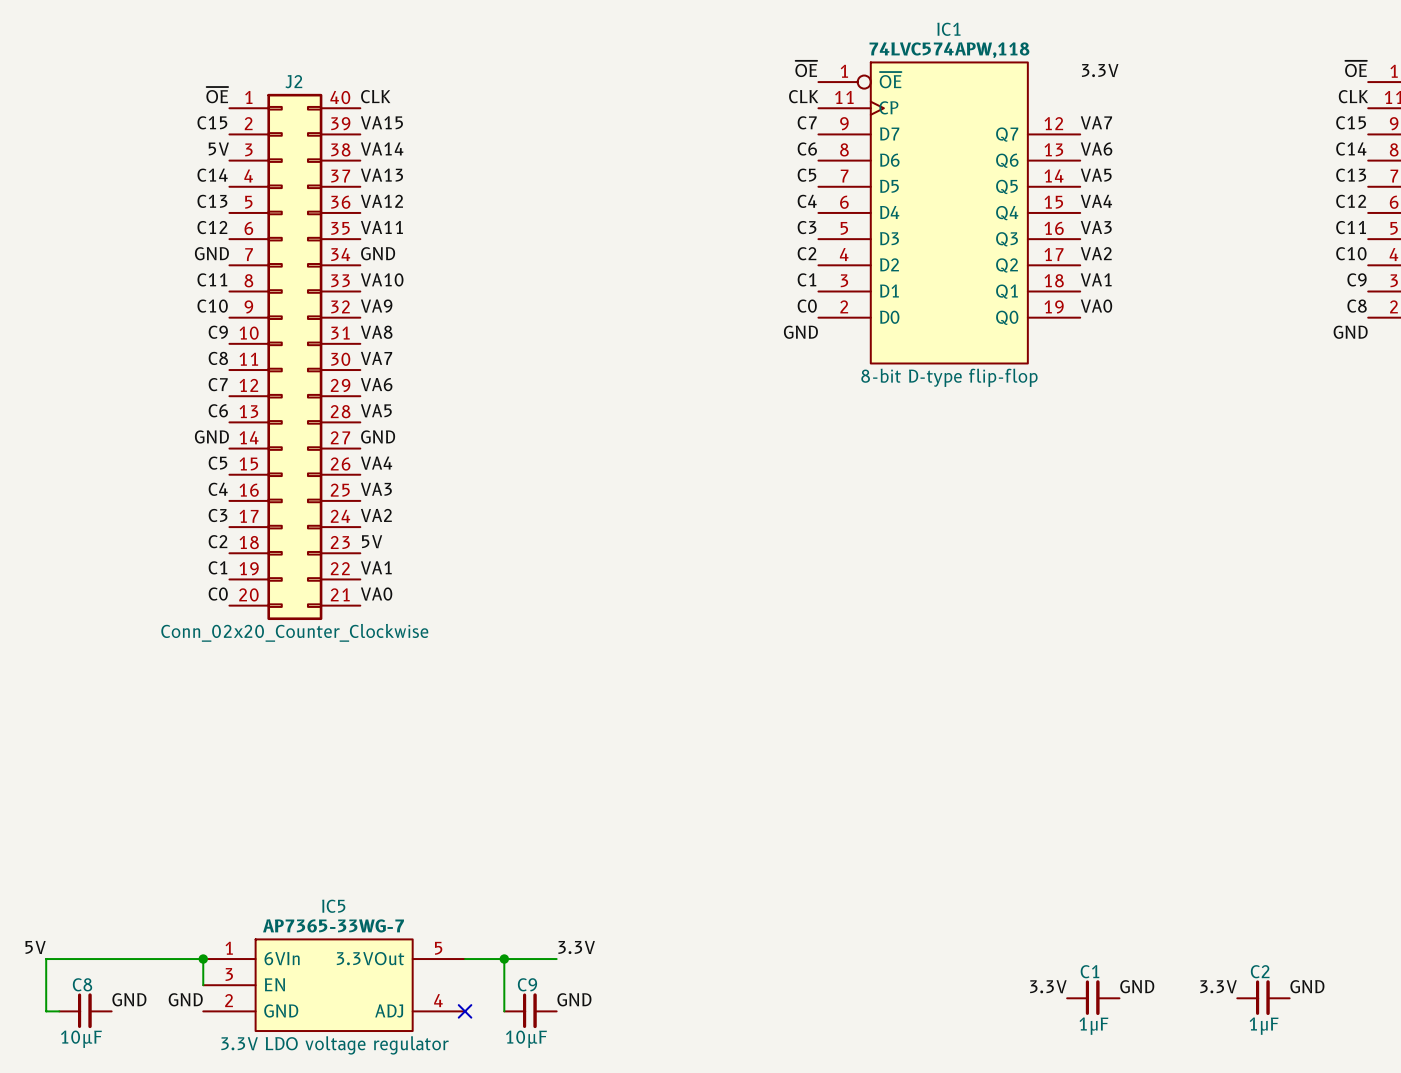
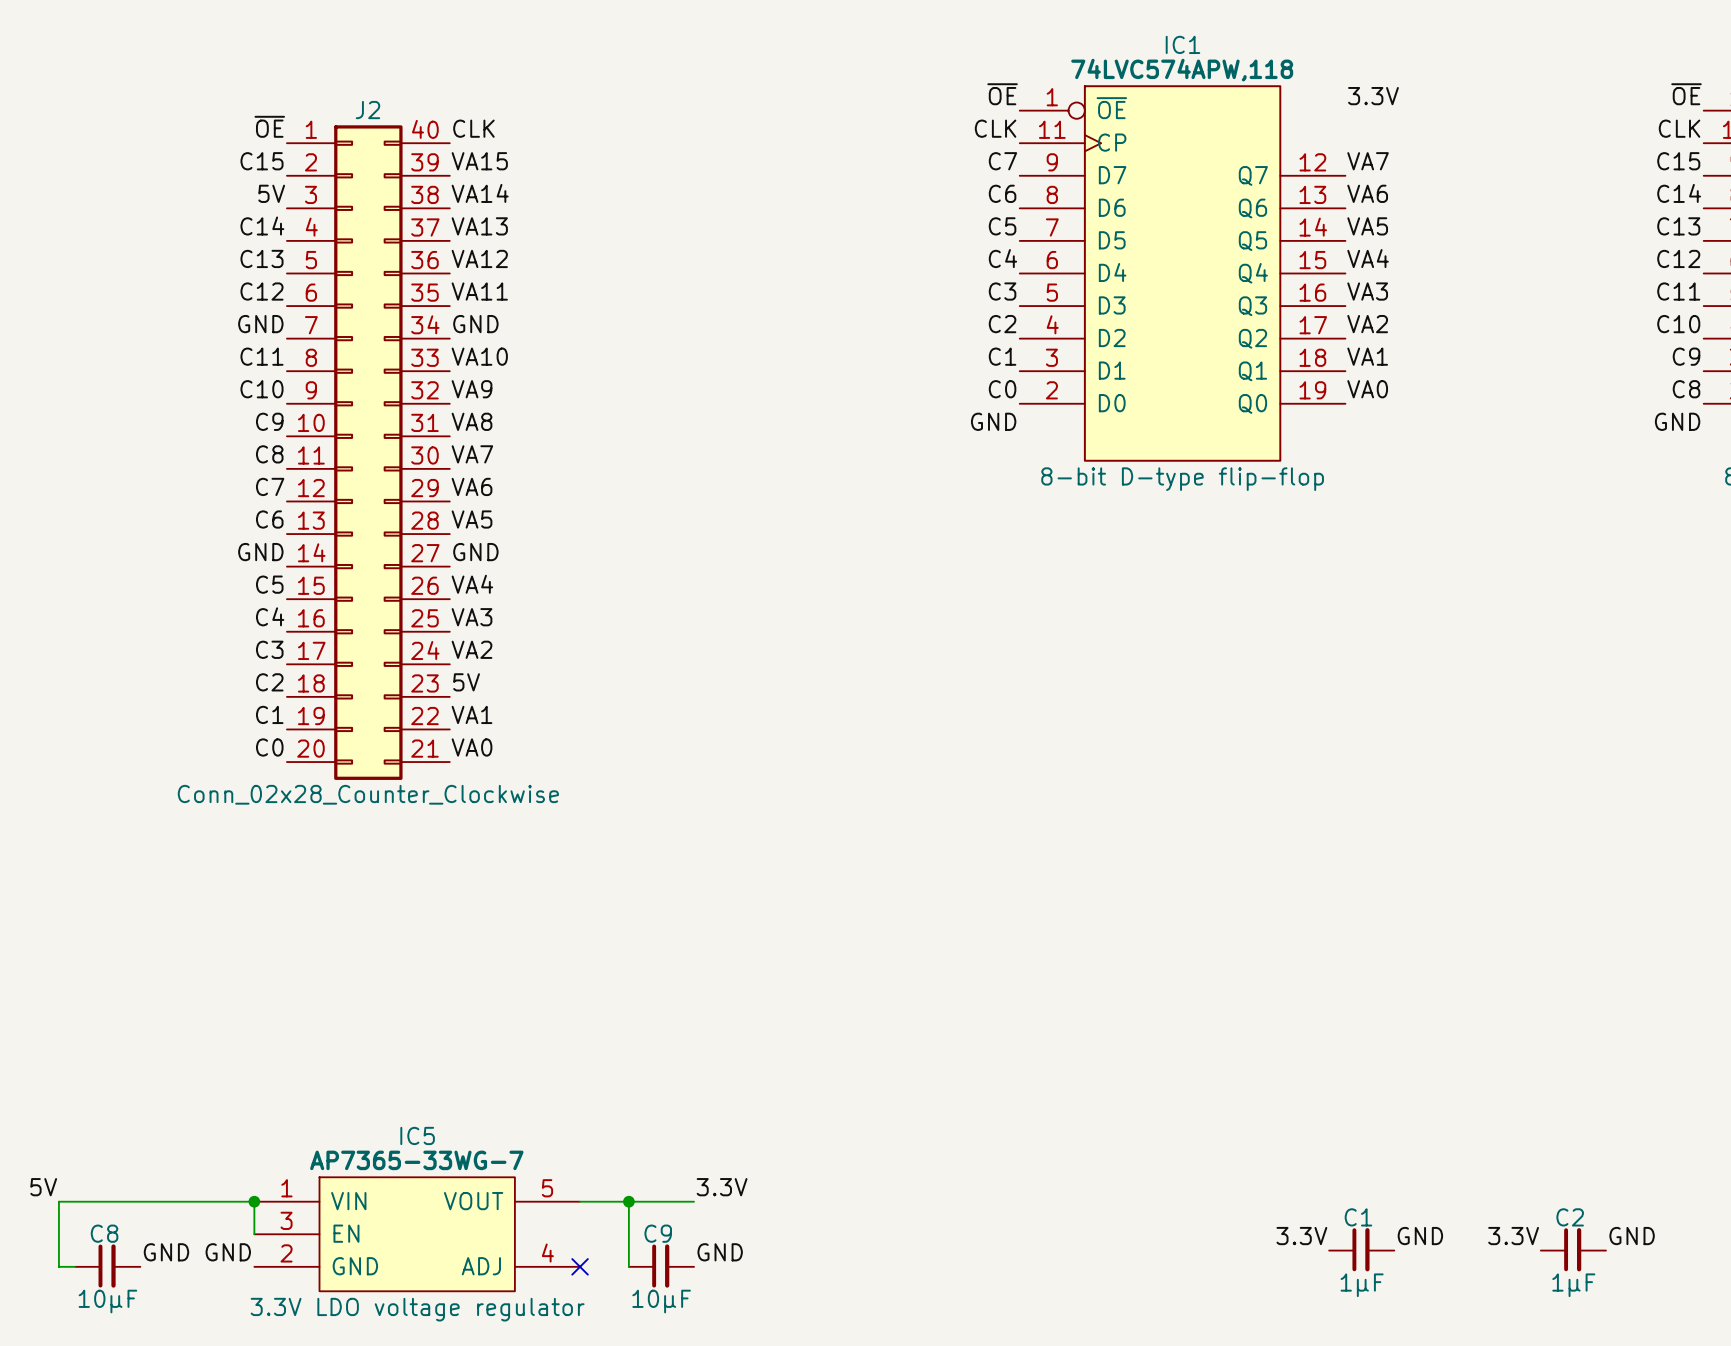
J2 value: Conn_02x20_Counter_Clockwise (294, 632) -> Conn_02x28_Counter_Clockwise (368, 794)
IC5 pin name: 6VIn (282, 958) -> VIN (348, 1201)
IC5 pin name: 3.3VOut (370, 958) -> VOUT (473, 1201)

